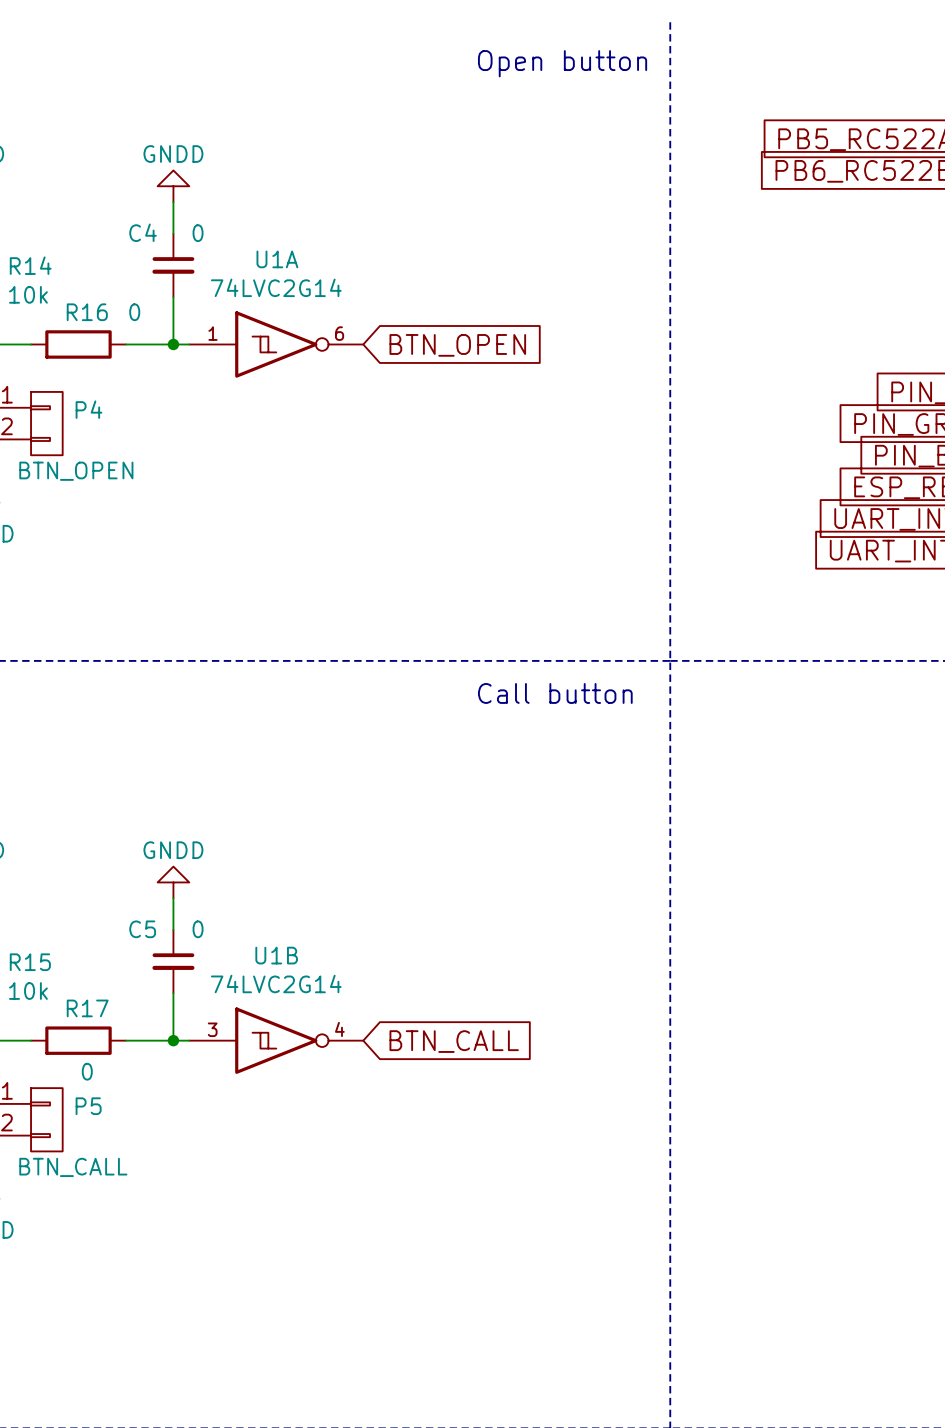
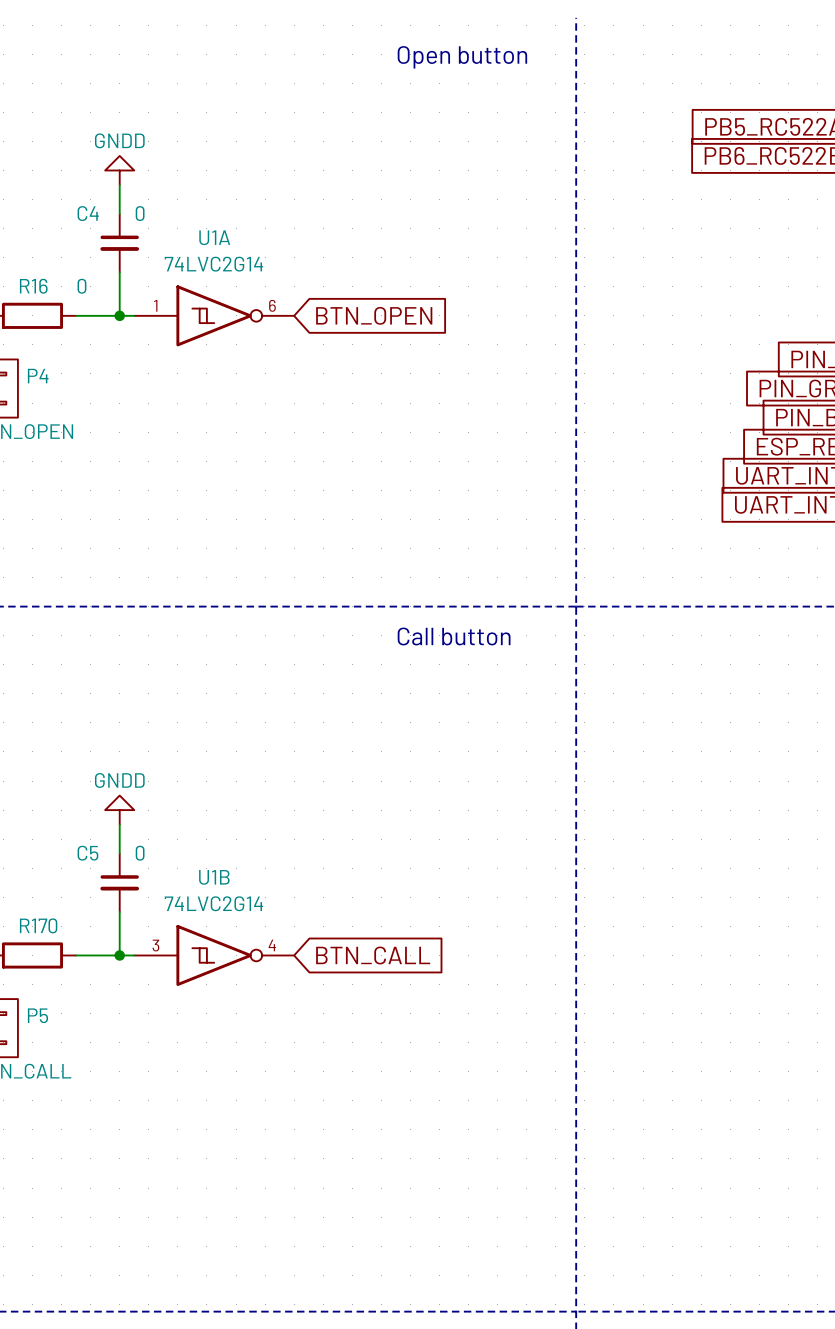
R17 value position: 0 (87, 1071) -> 0 (52, 925)

